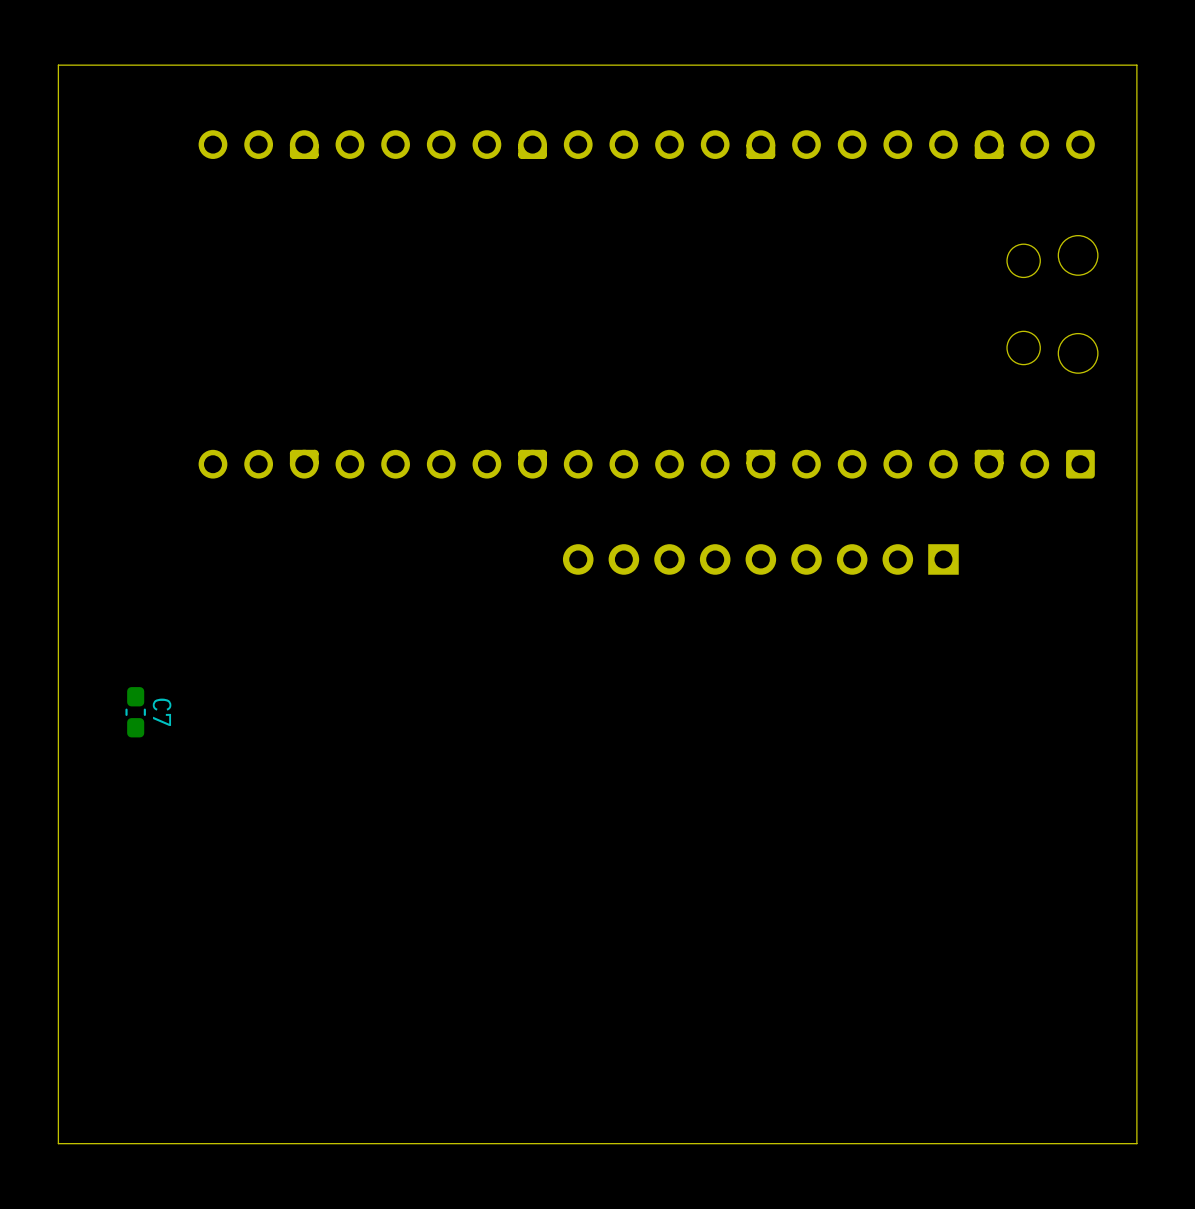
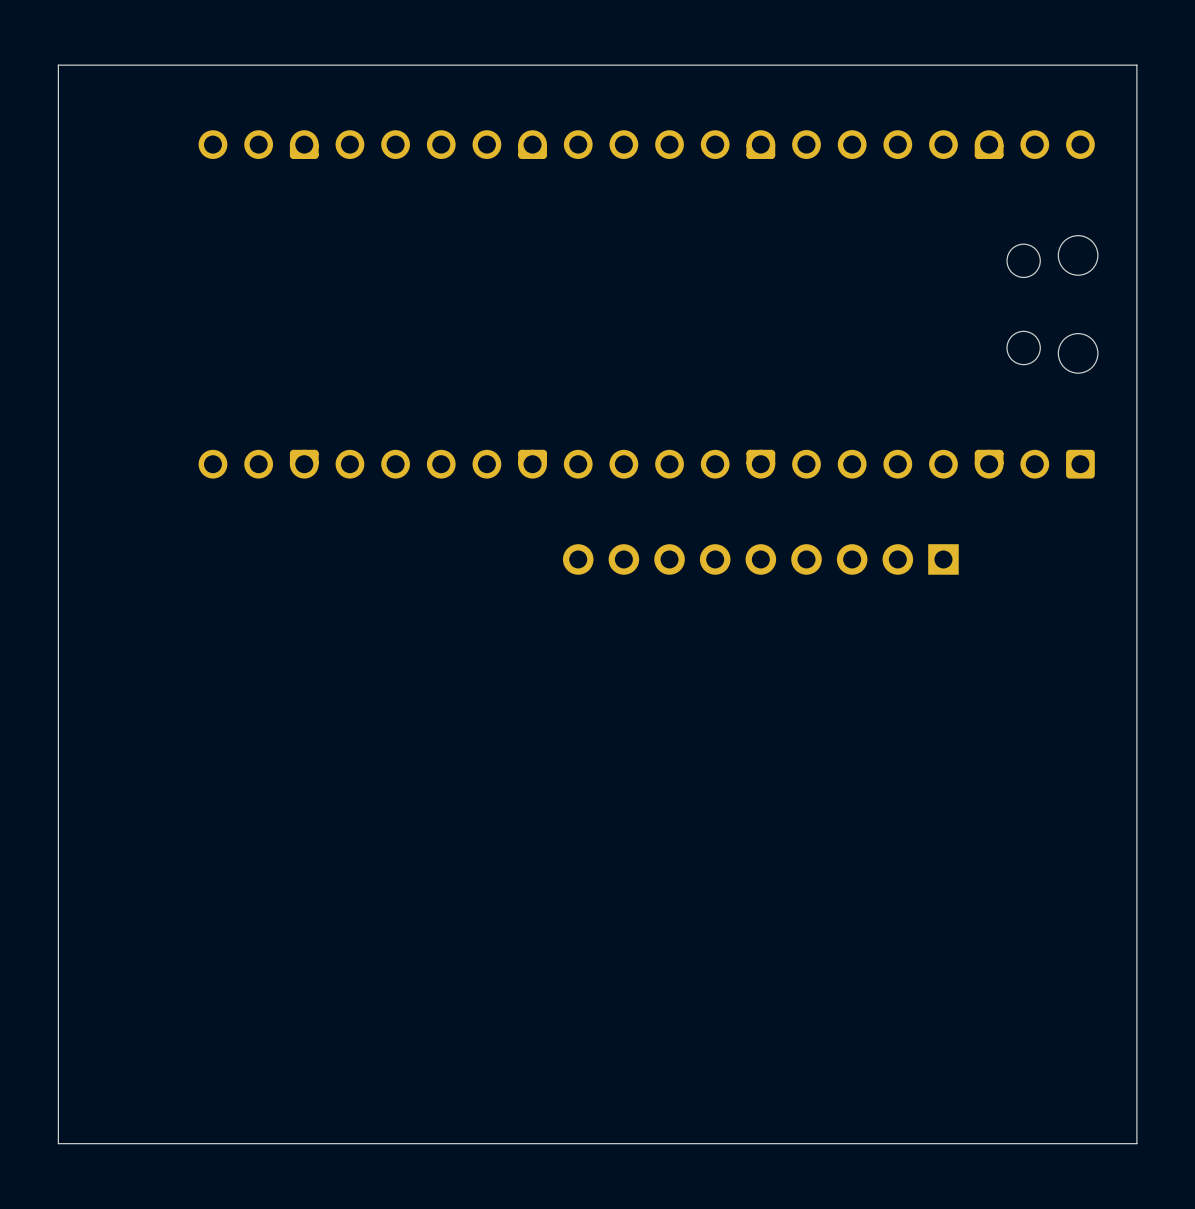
C7: (135, 712) -> none

